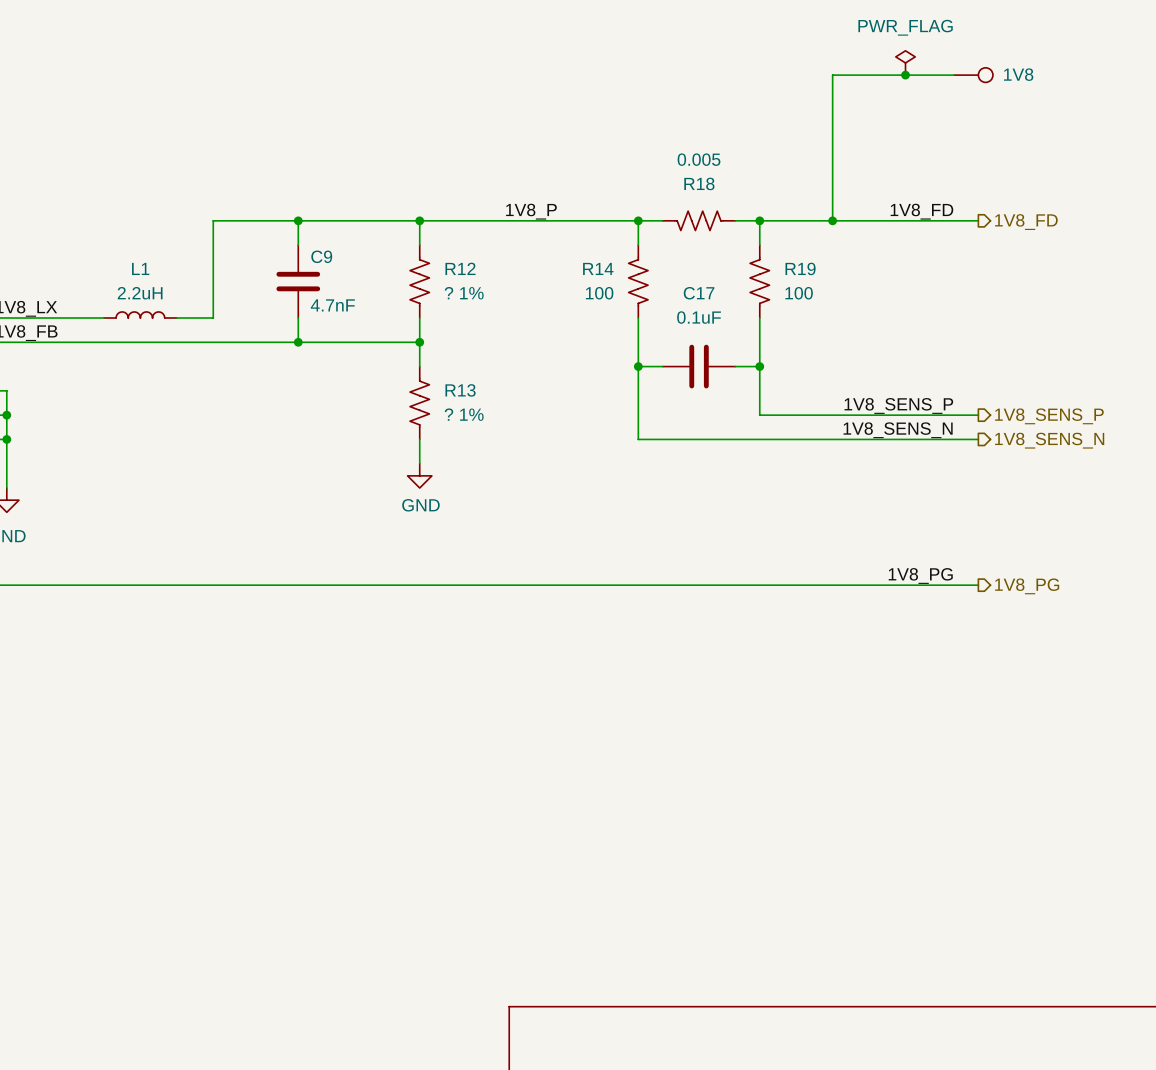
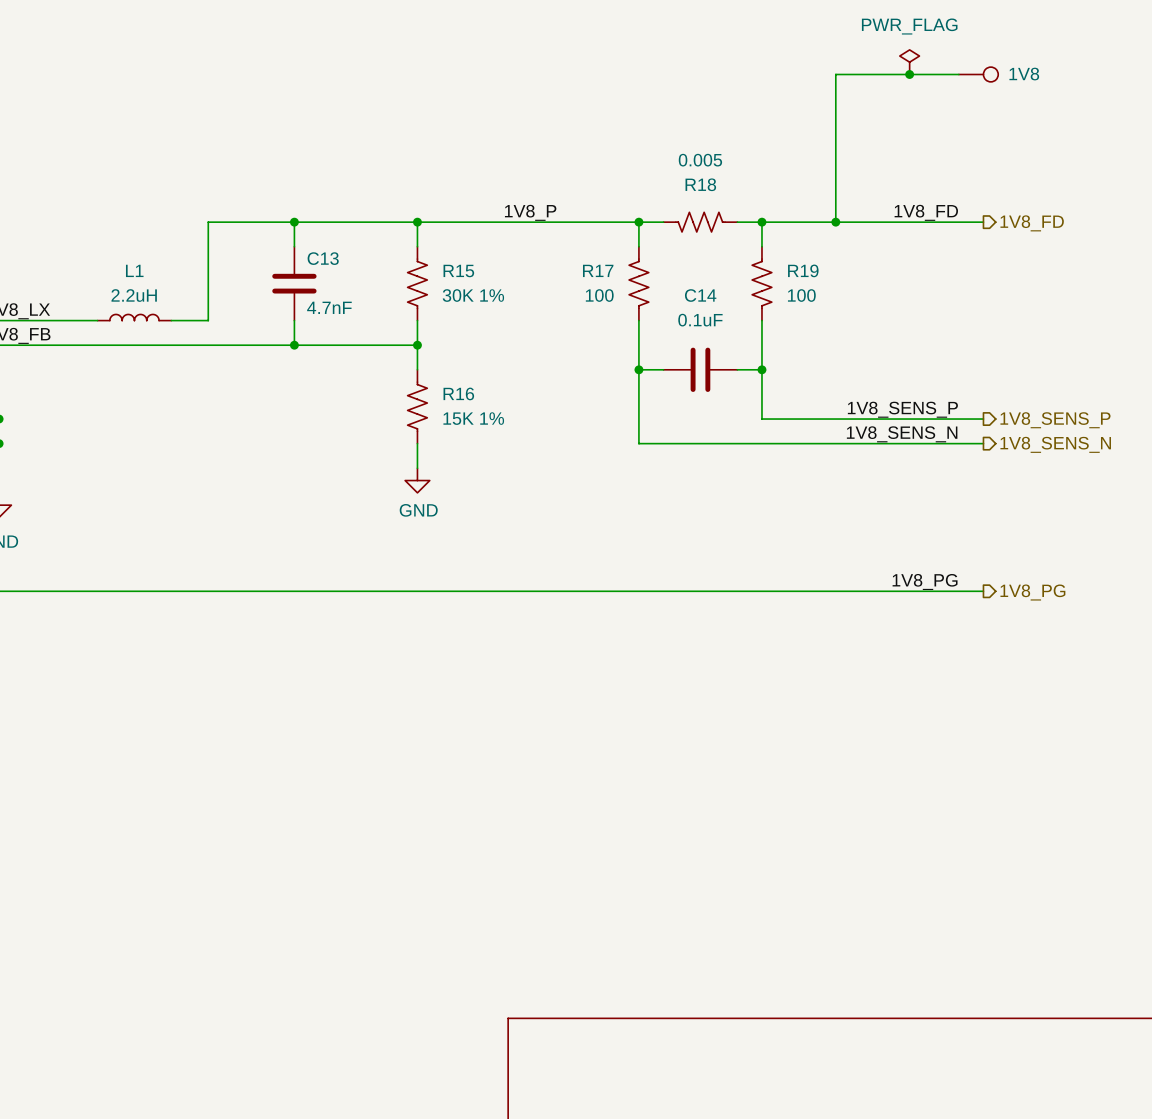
C9 name: C9 (321, 256) -> C13 (323, 258)
R12 name: R12 (460, 268) -> R15 (458, 271)
R14 name: R14 (598, 268) -> R17 (598, 270)
R12 value: ? 1% (464, 293) -> 30K 1% (473, 295)
C17 name: C17 (699, 293) -> C14 (700, 295)
R13 name: R13 (460, 390) -> R16 (458, 393)
R13 value: ? 1% (464, 414) -> 15K 1% (473, 418)

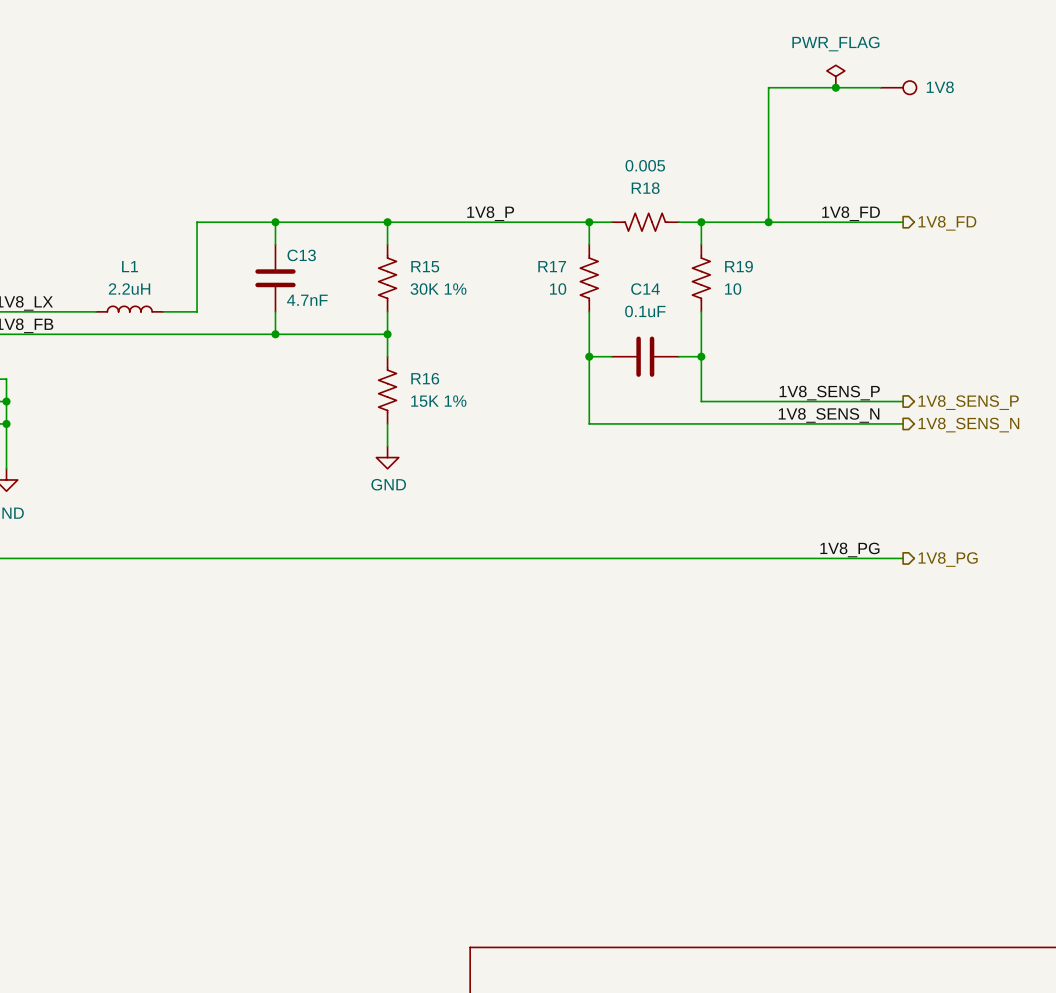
R17 flip: as is (638, 283) -> left-right (589, 278)
R19 flip: as is (761, 283) -> left-right (701, 278)
R17 value: 100 (599, 295) -> 10 (558, 289)
R19 value: 100 (801, 295) -> 10 (733, 289)

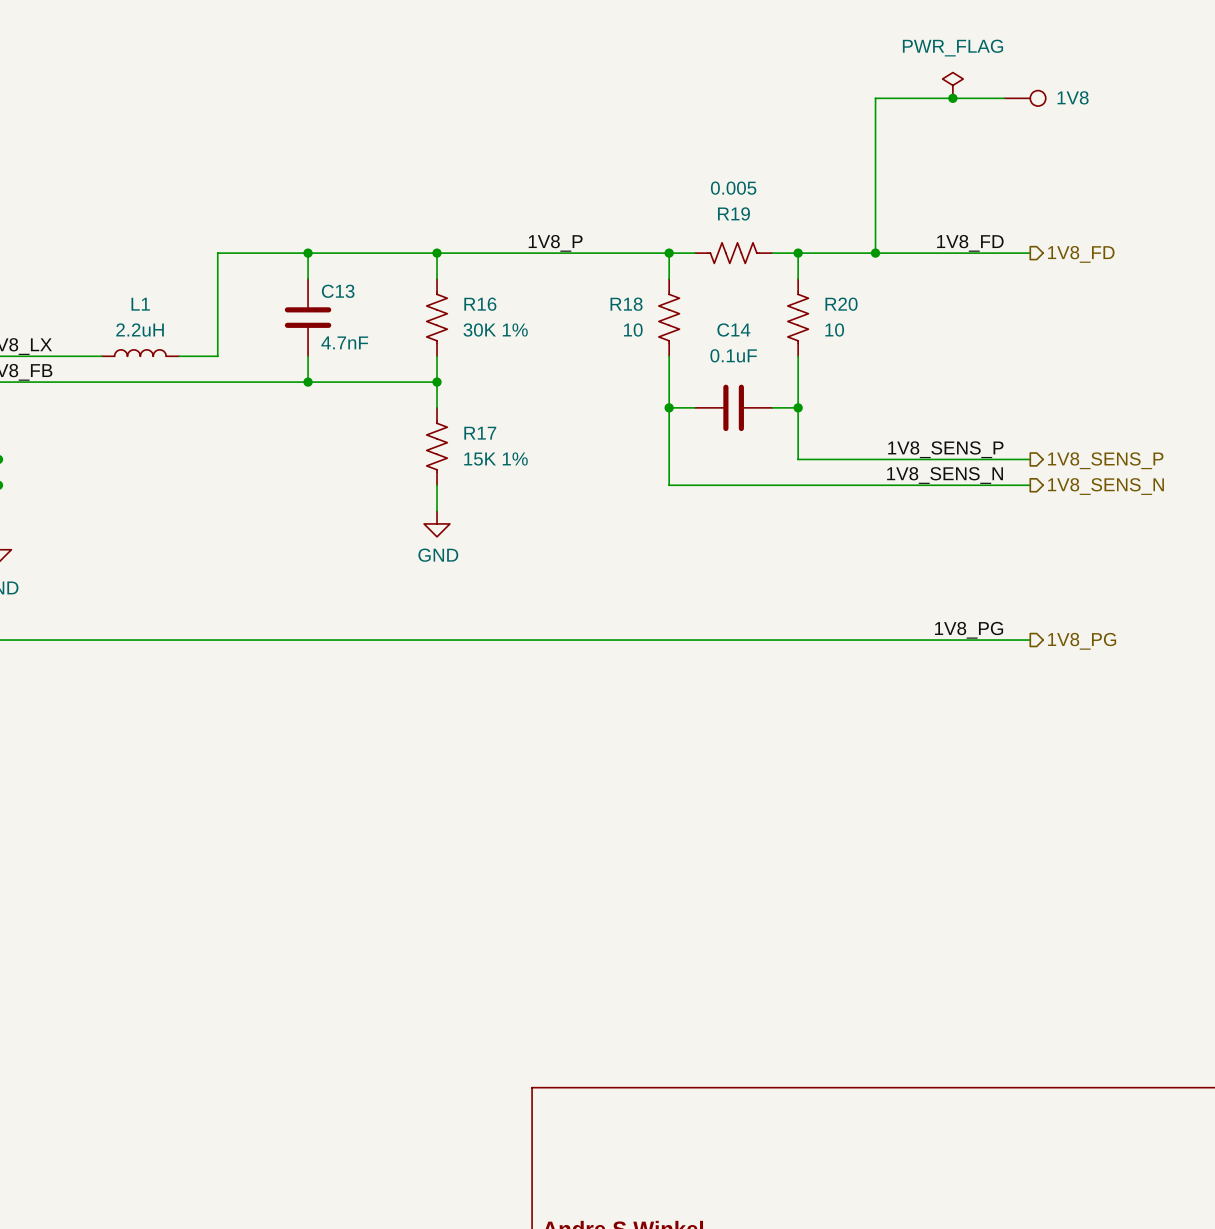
R18 name: R18 (645, 188) -> R19 (733, 213)
R15 name: R15 (425, 266) -> R16 (480, 304)
R17 name: R17 (552, 266) -> R18 (626, 304)
R19 name: R19 (739, 266) -> R20 (841, 304)
R16 name: R16 (425, 378) -> R17 (480, 433)

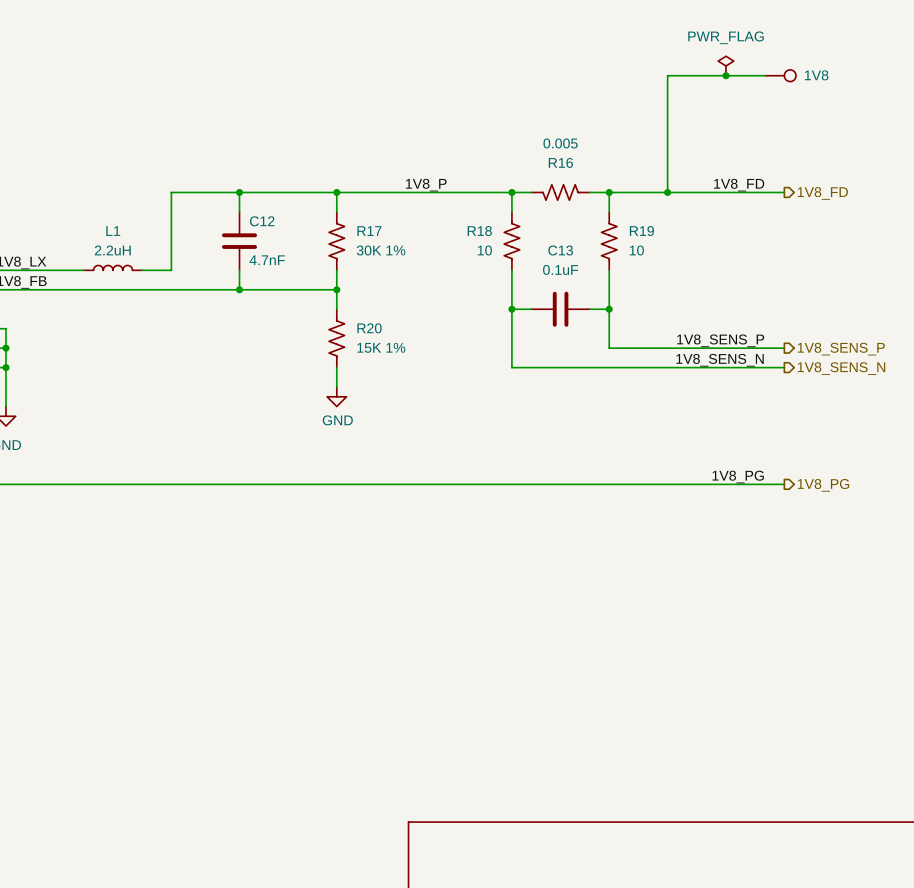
R19 name: R19 (733, 213) -> R16 (560, 162)
C13 name: C13 (338, 291) -> C12 (262, 221)
R16 name: R16 (480, 304) -> R17 (369, 231)
R20 name: R20 (841, 304) -> R19 (641, 231)
C14 name: C14 (733, 330) -> C13 (560, 250)
R17 name: R17 (480, 433) -> R20 (369, 328)

